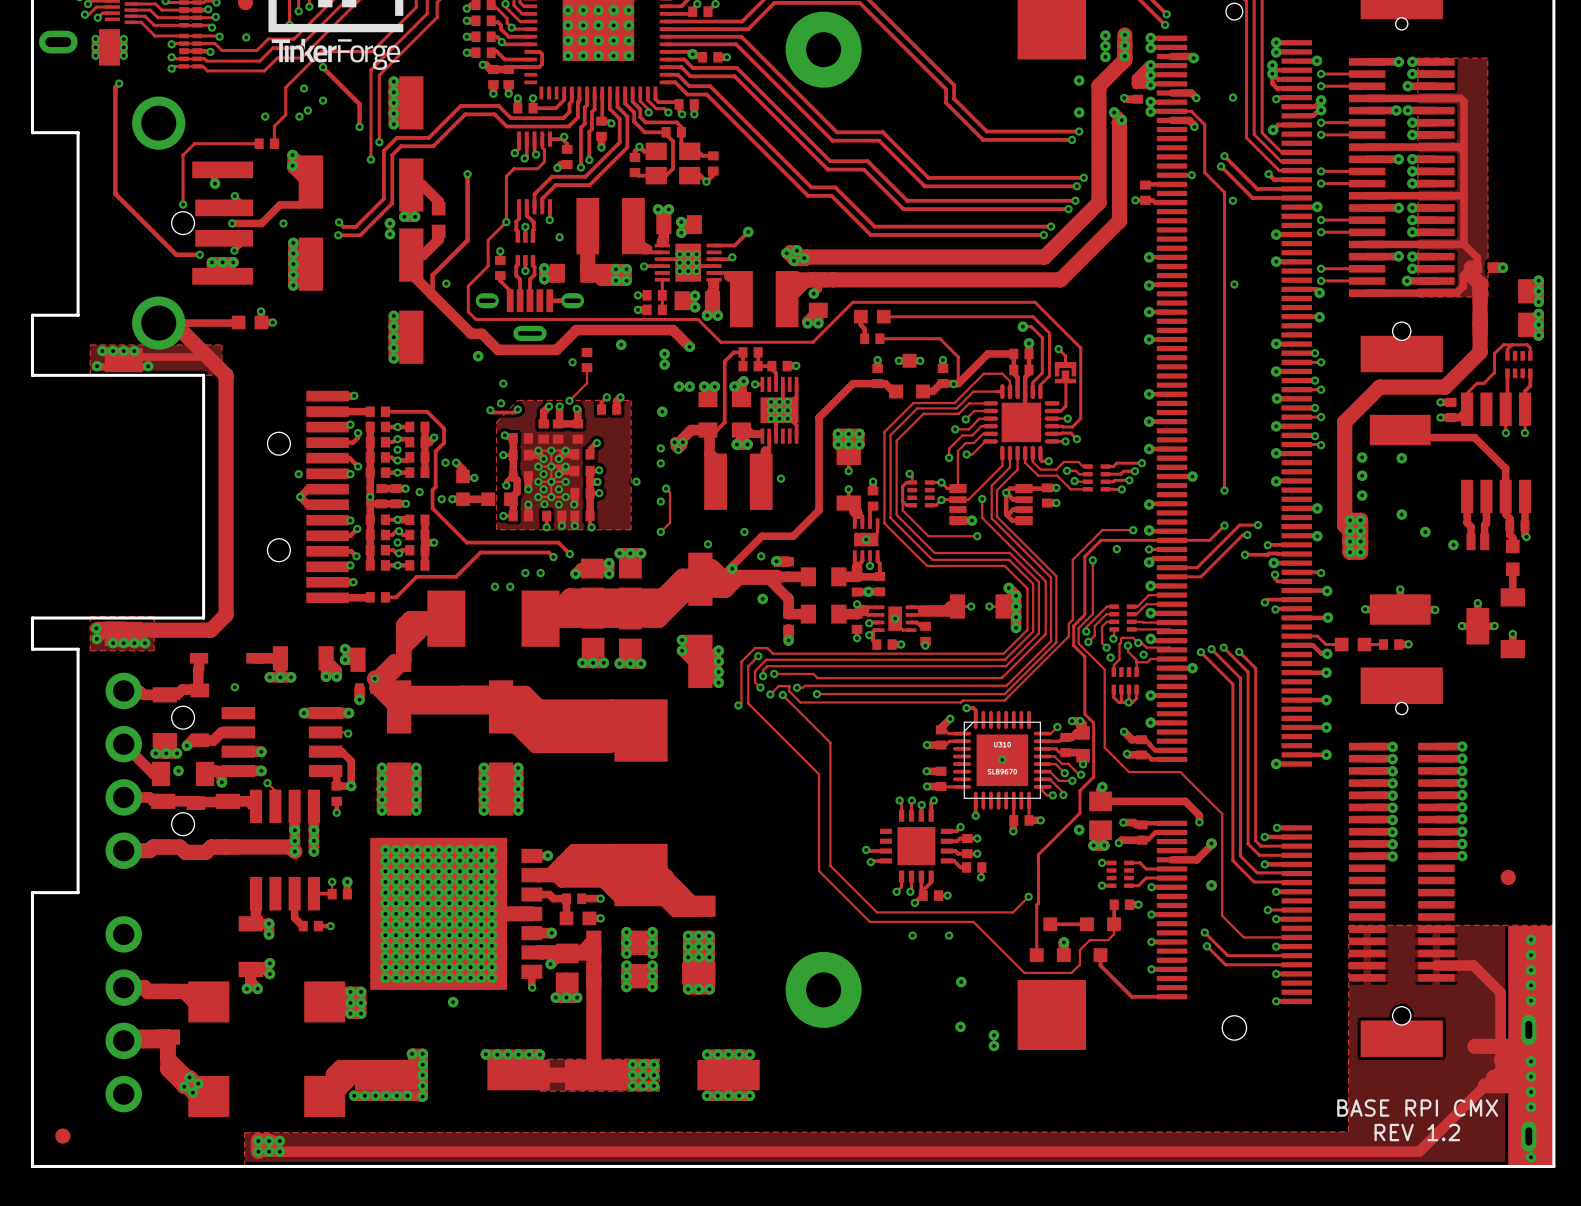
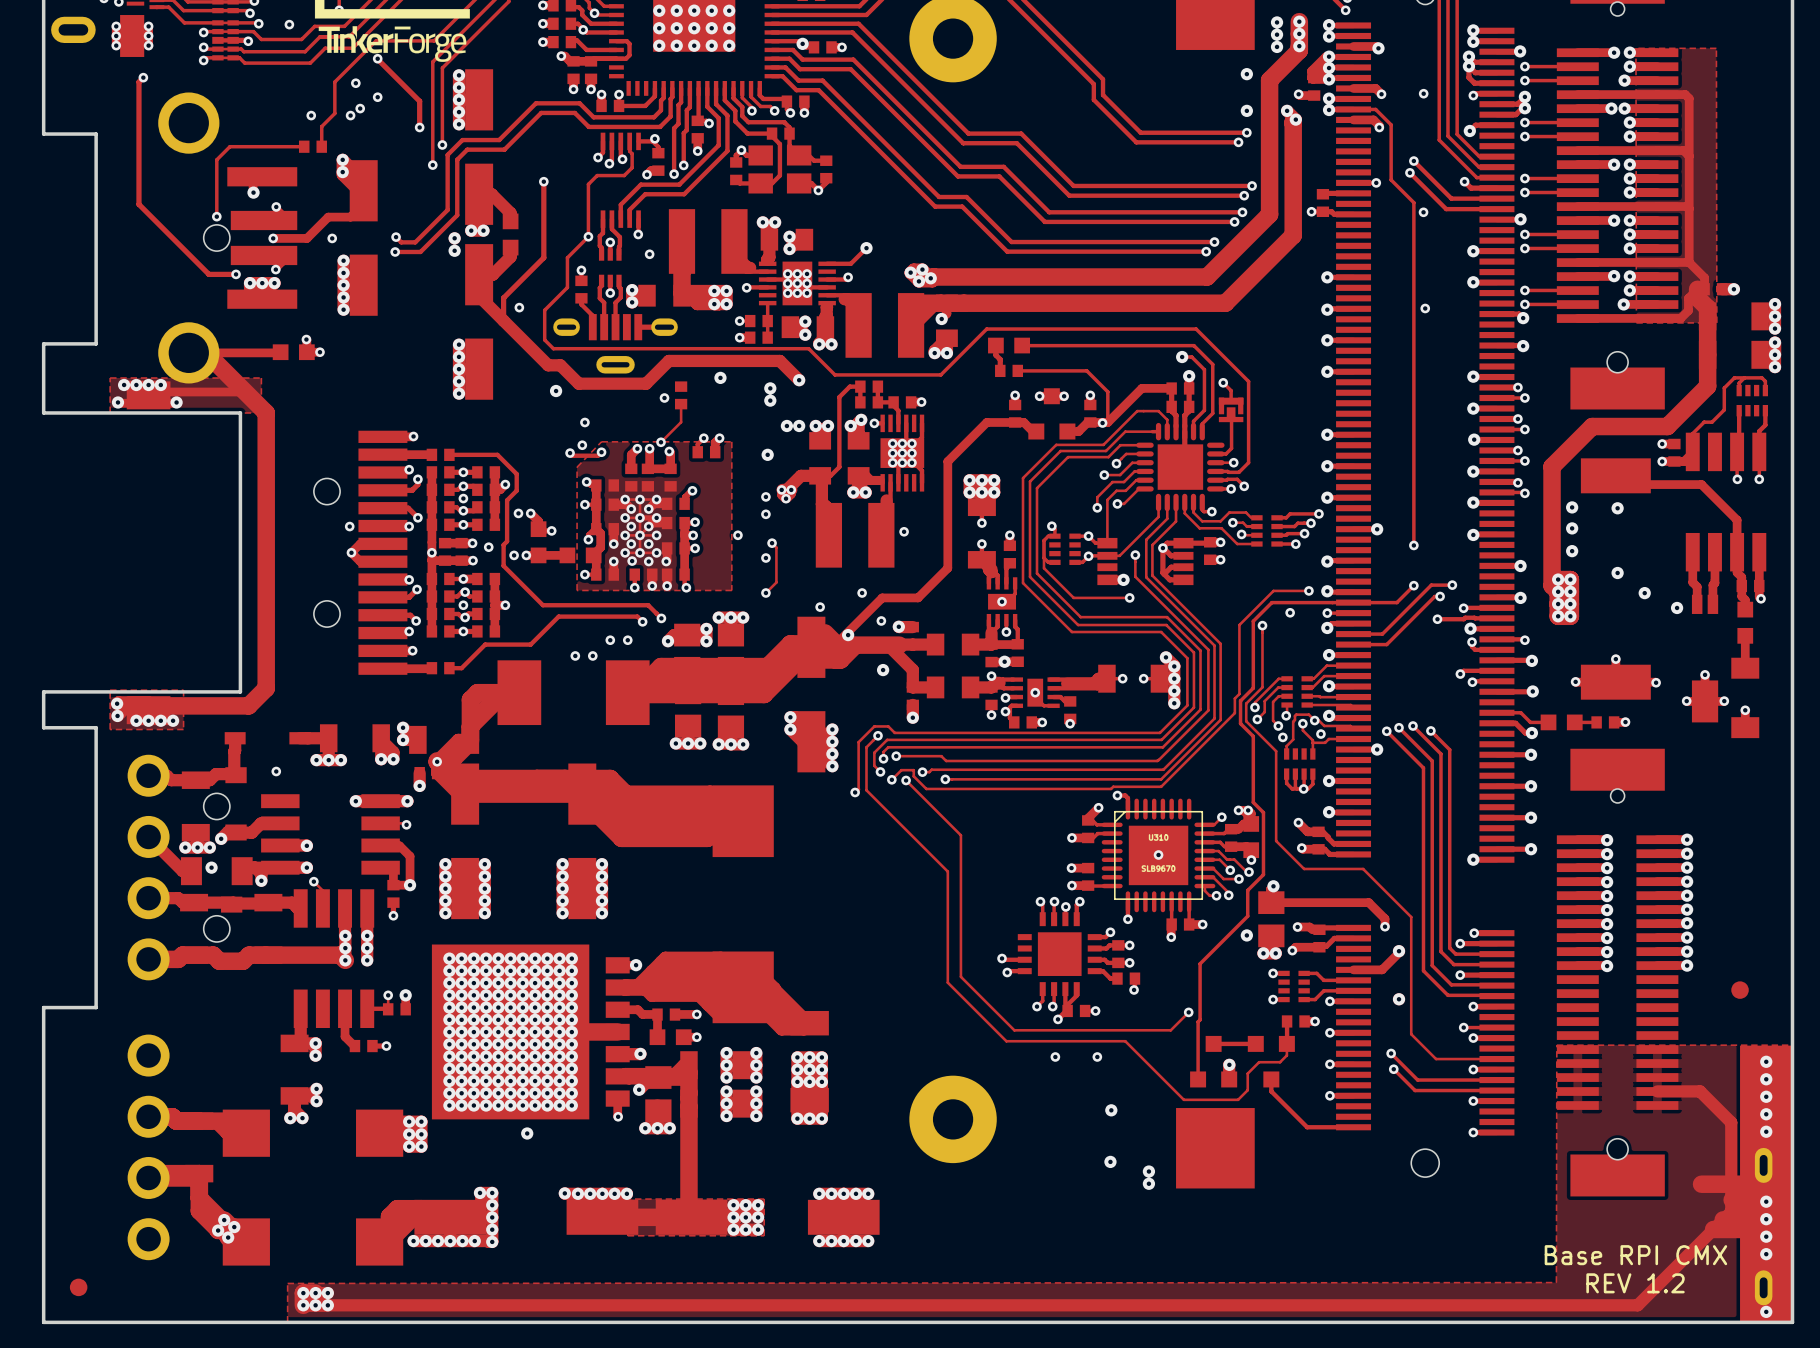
text: BASE RPI CMX (1417, 1108) -> Base RPI CMX (1635, 1255)

